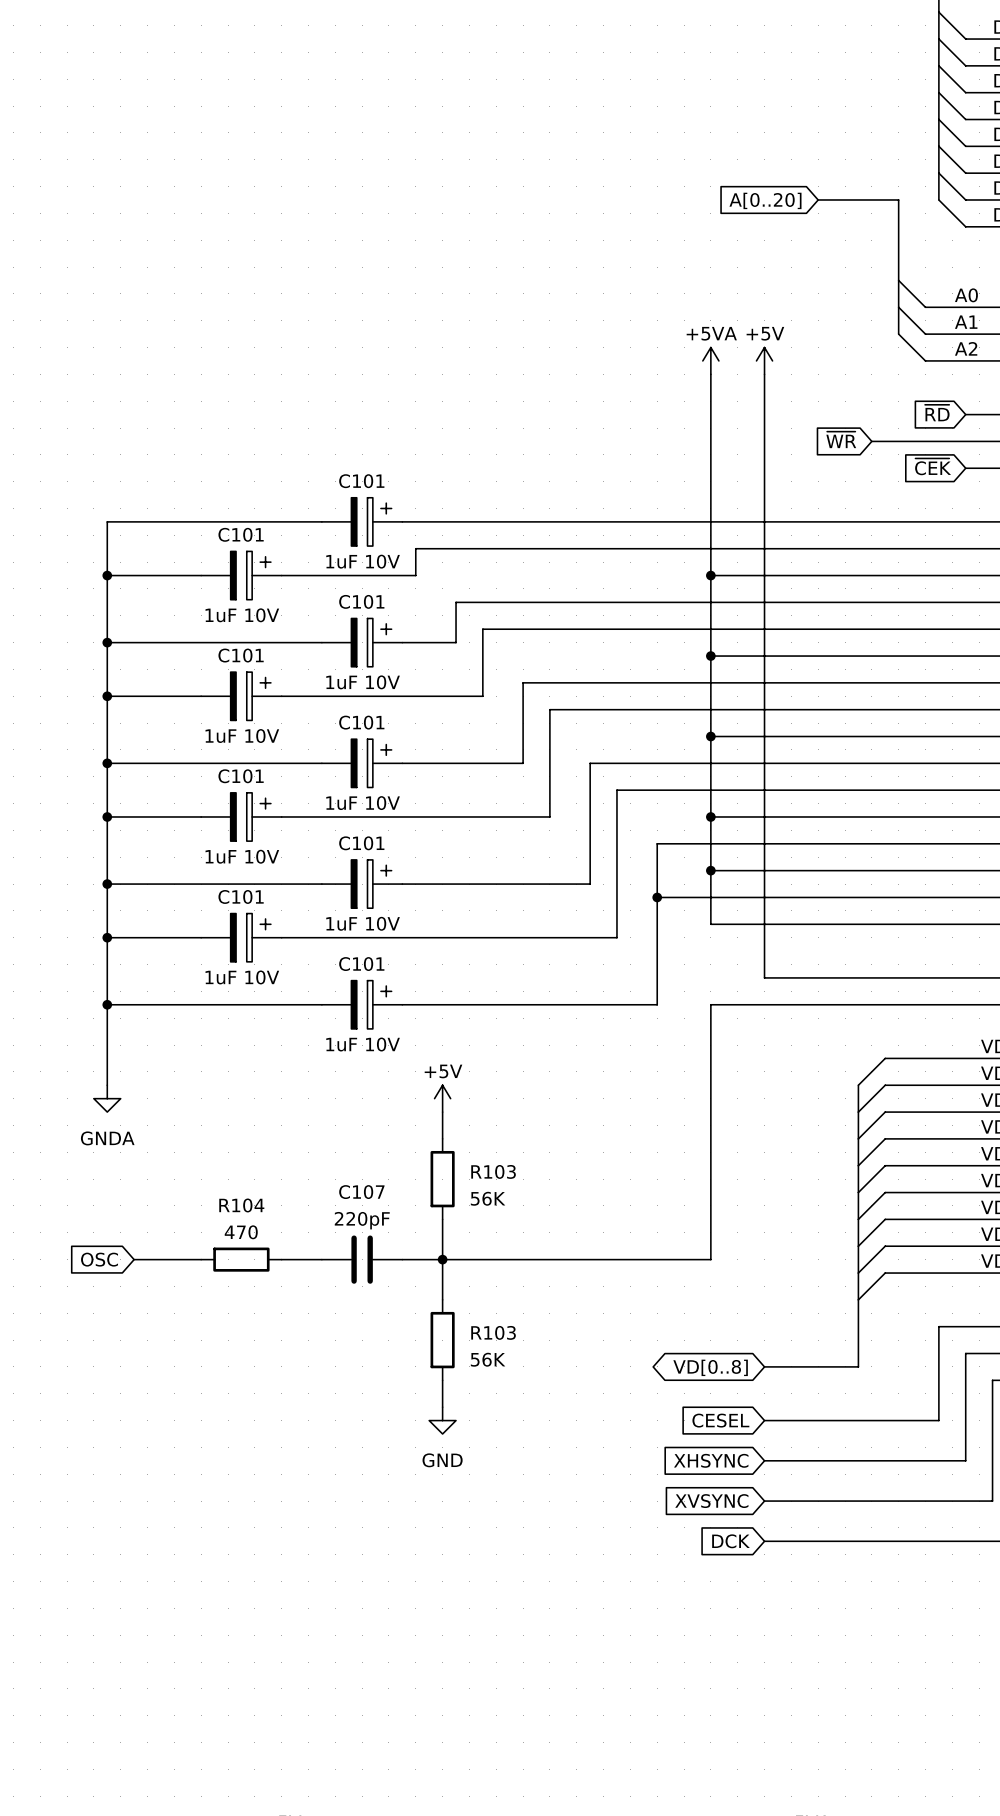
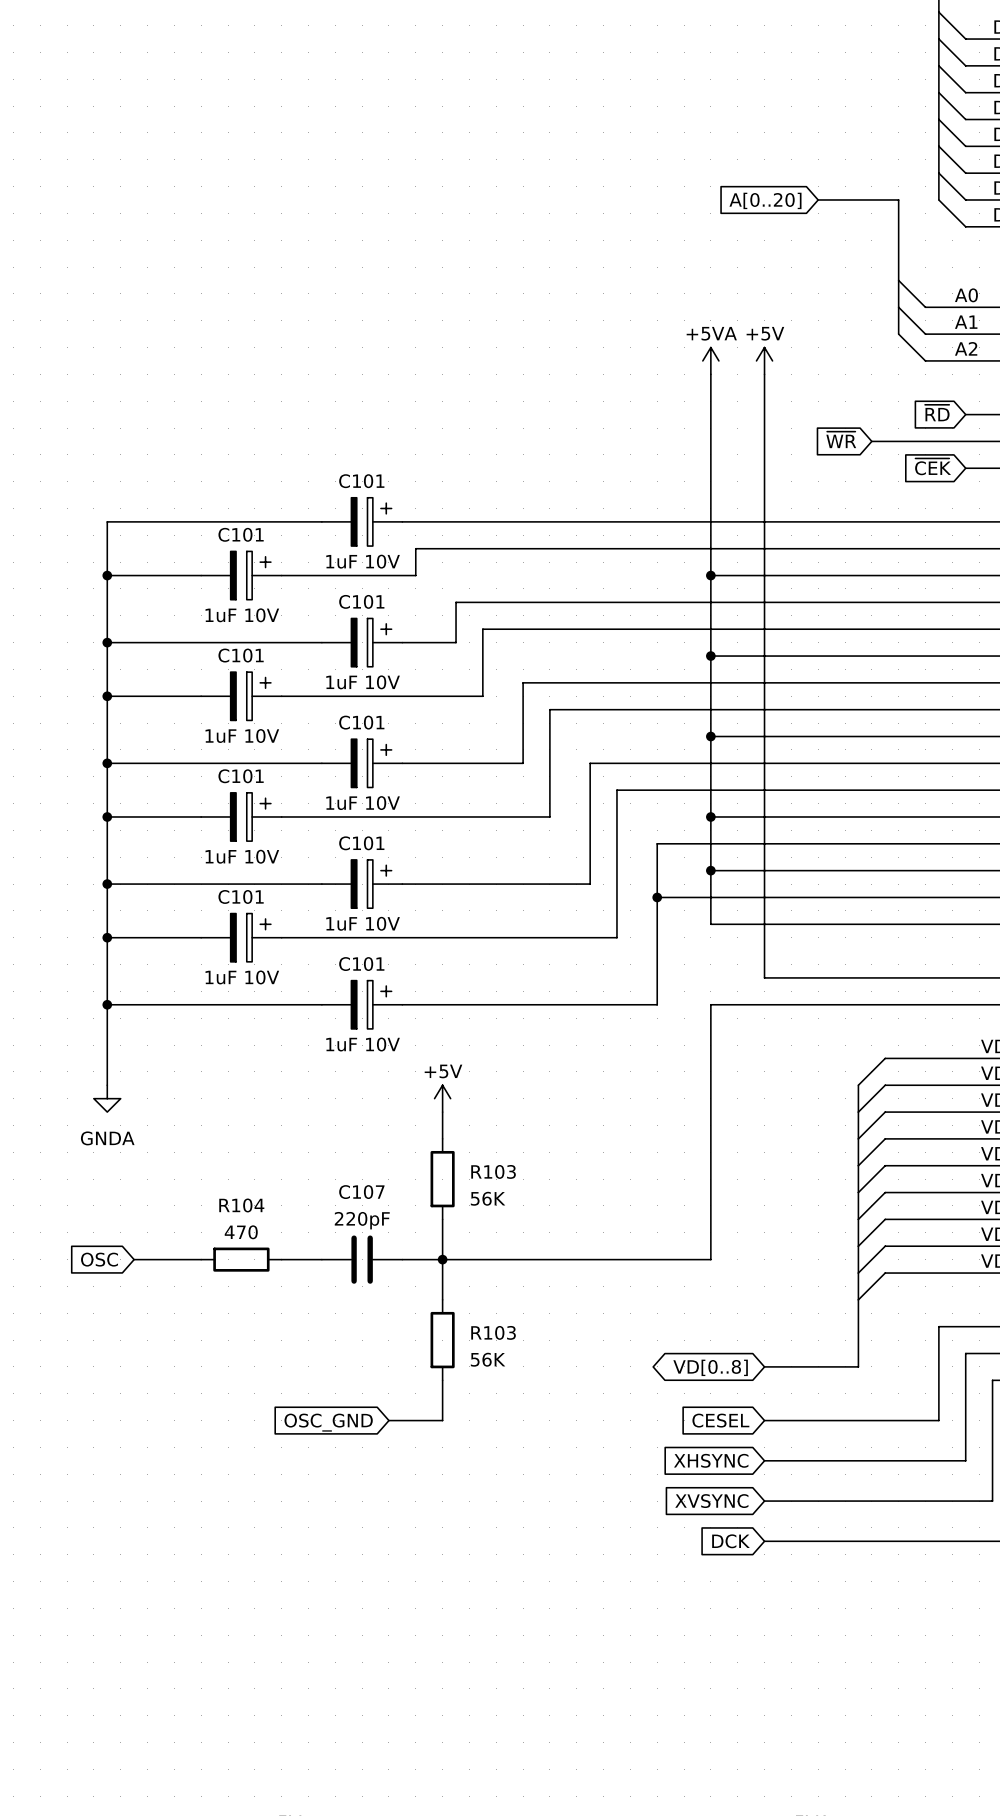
wire: none -> (442, 1407) (442, 1420) (388, 1420)
power symbol: GND (442, 1420) -> none
global label: none -> OSC_GND (328, 1422)

